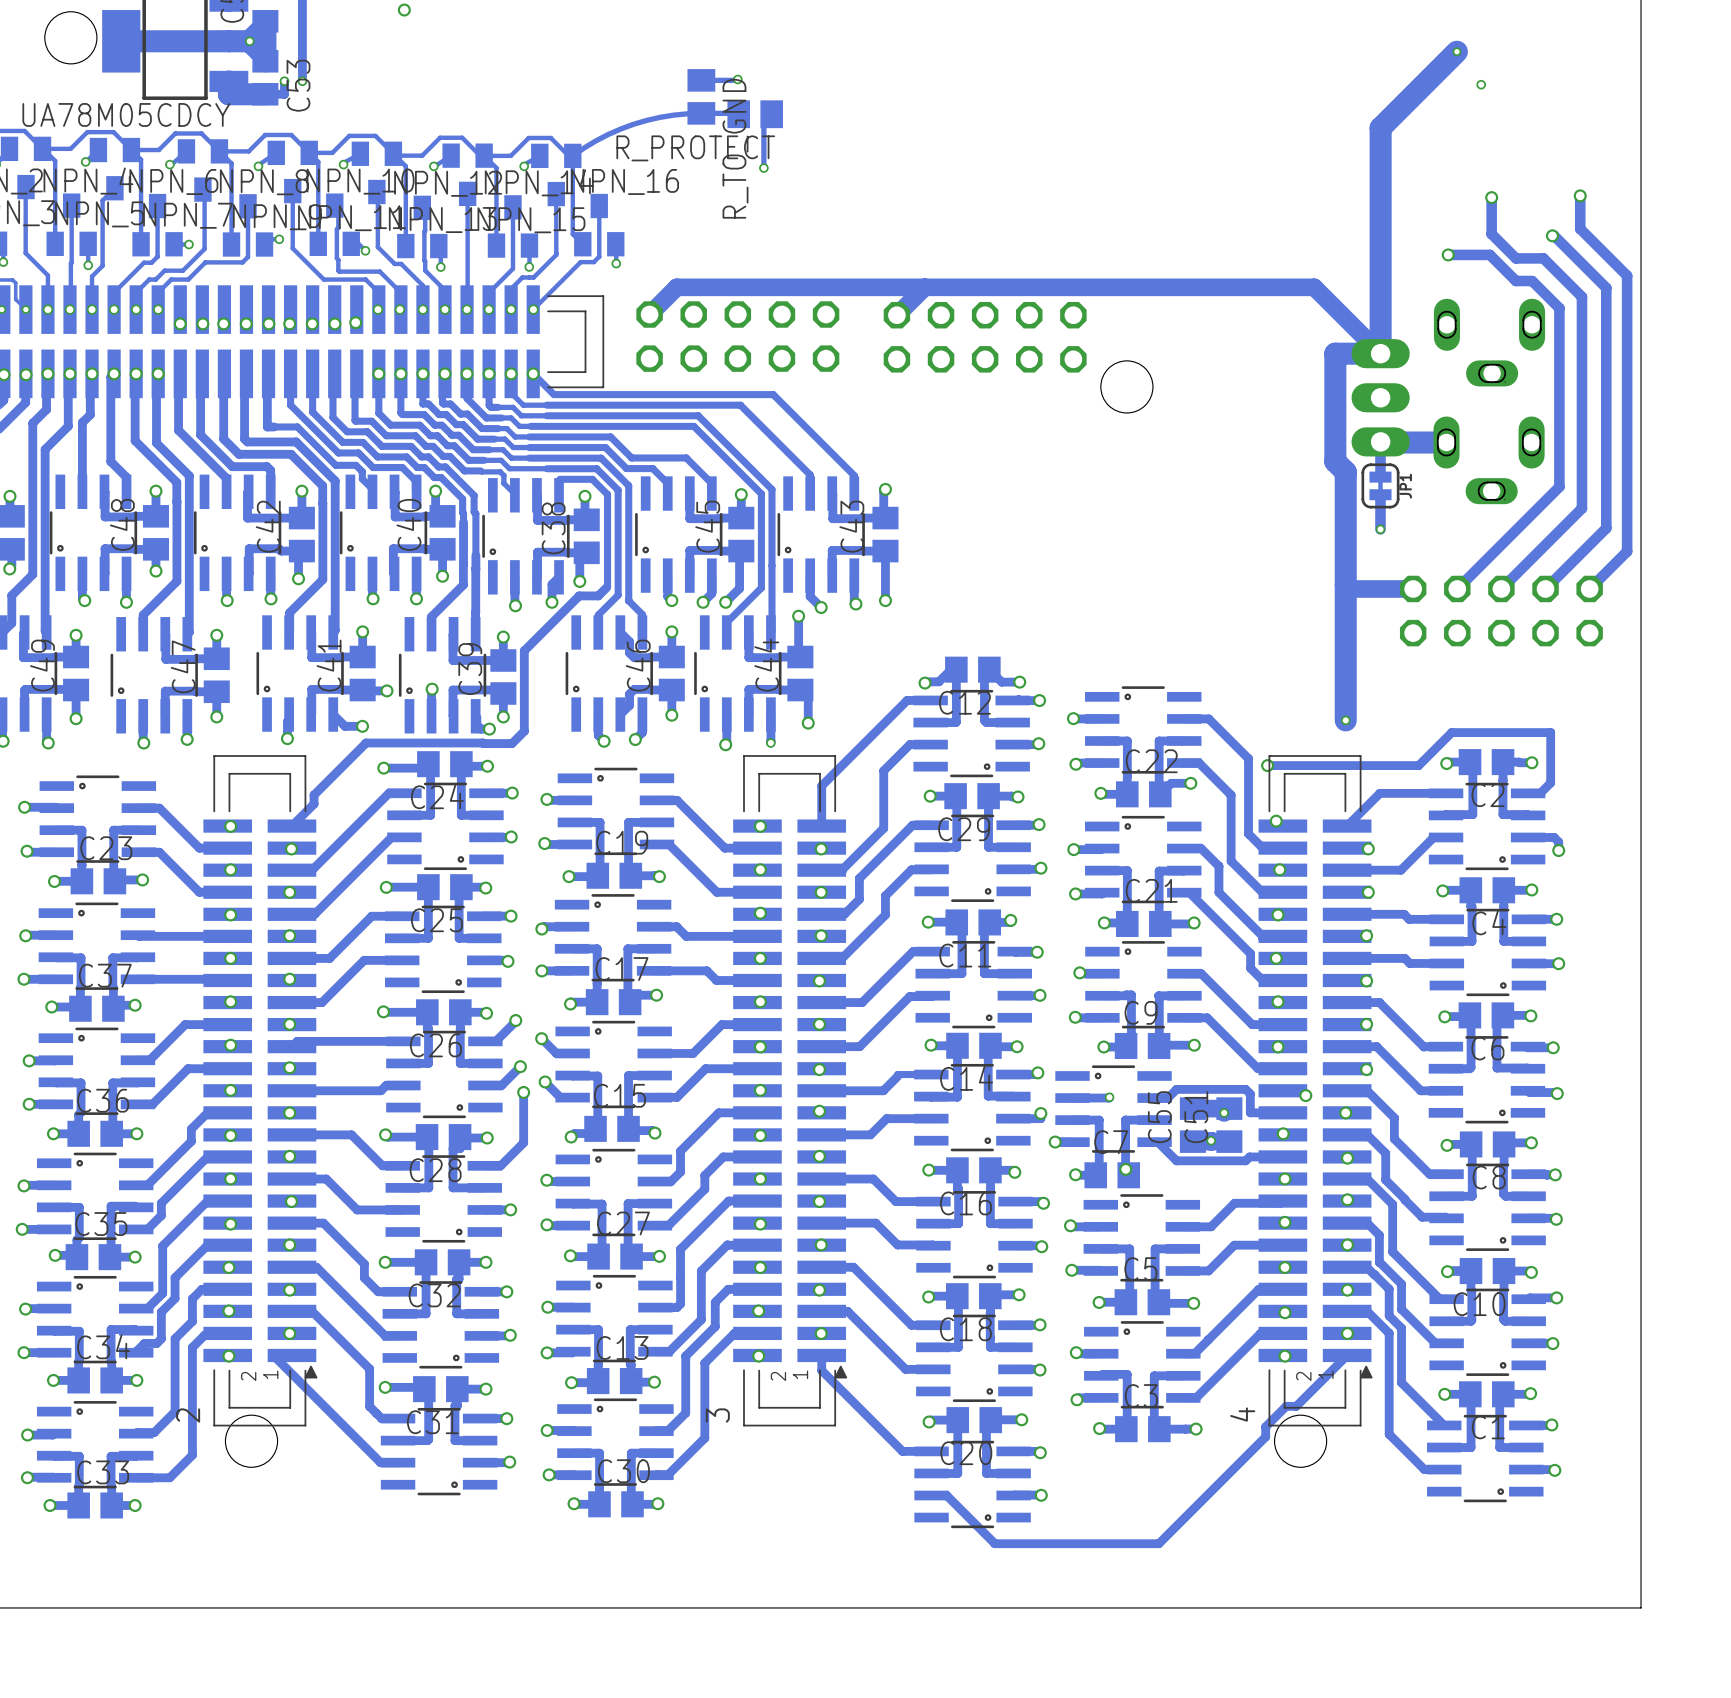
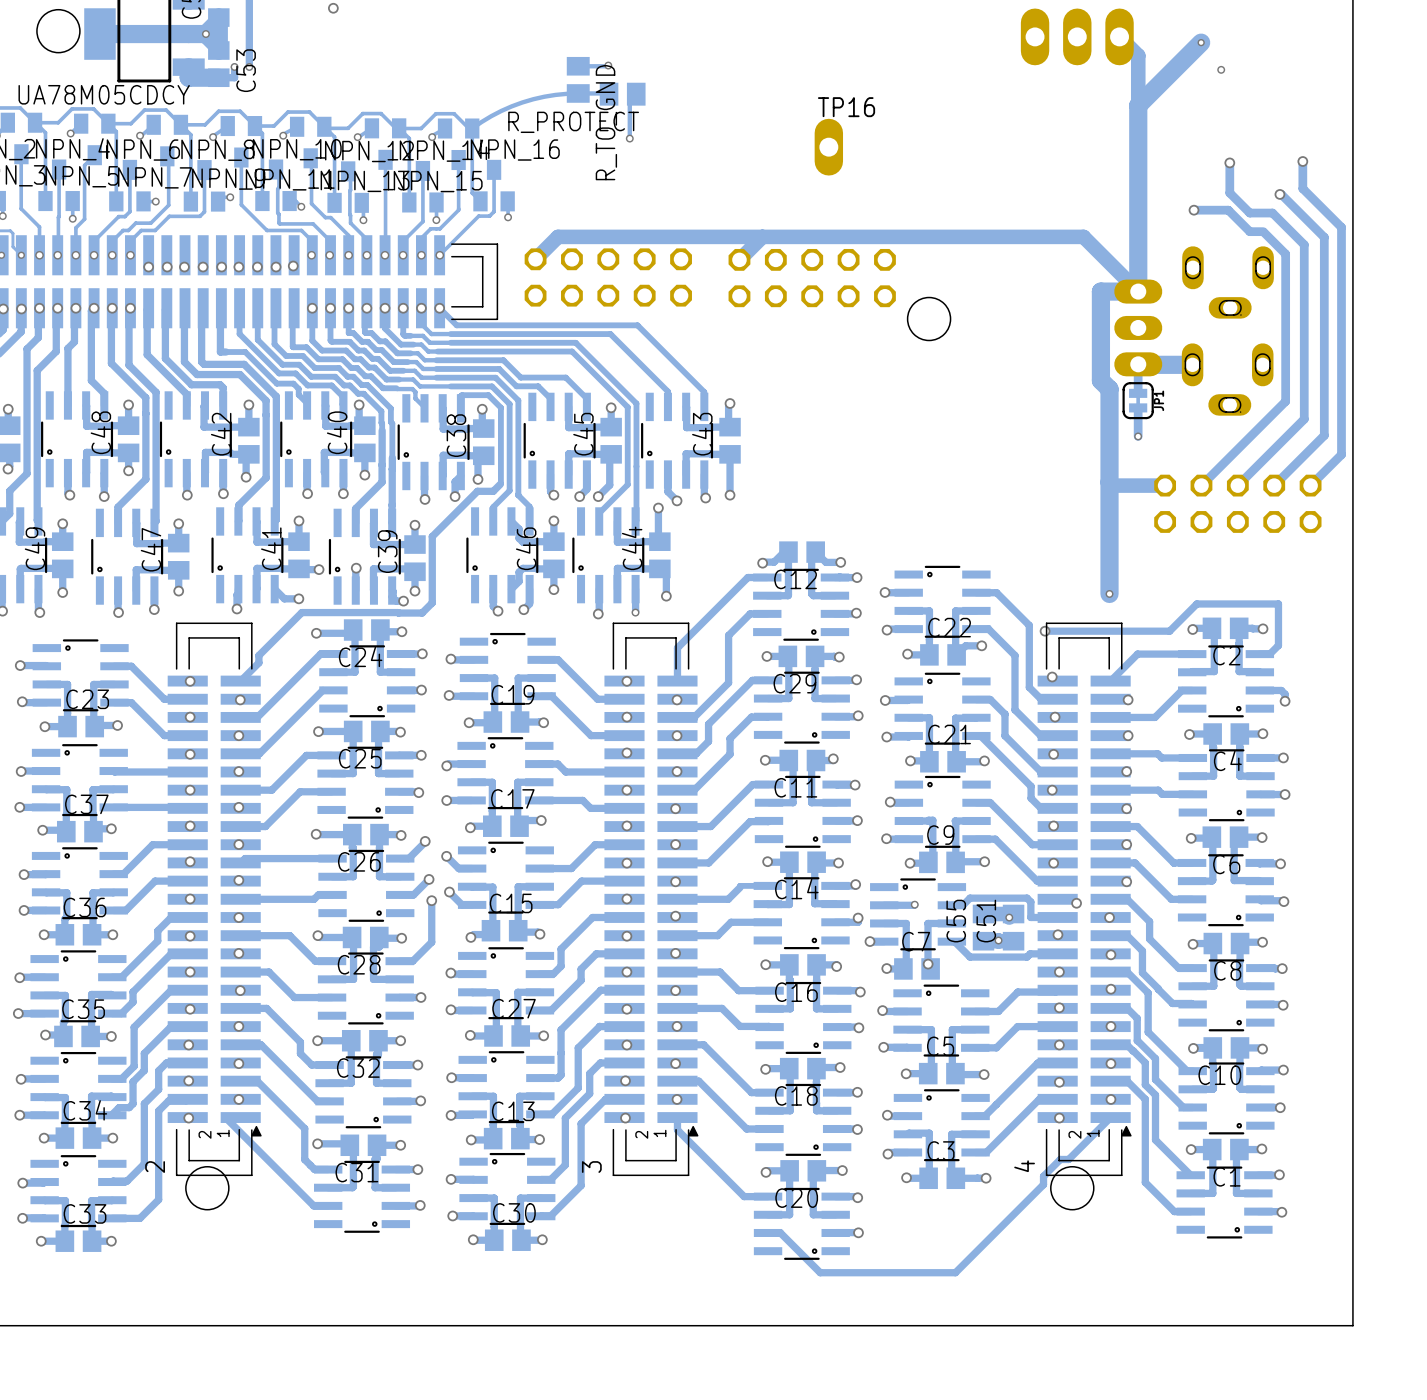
part: none -> (1035, 36)
part: none -> (1077, 36)
track: none -> (1119, 36) (1138, 55) (1138, 105)
part: none -> (1119, 36)
TP16: none -> (828, 147)

